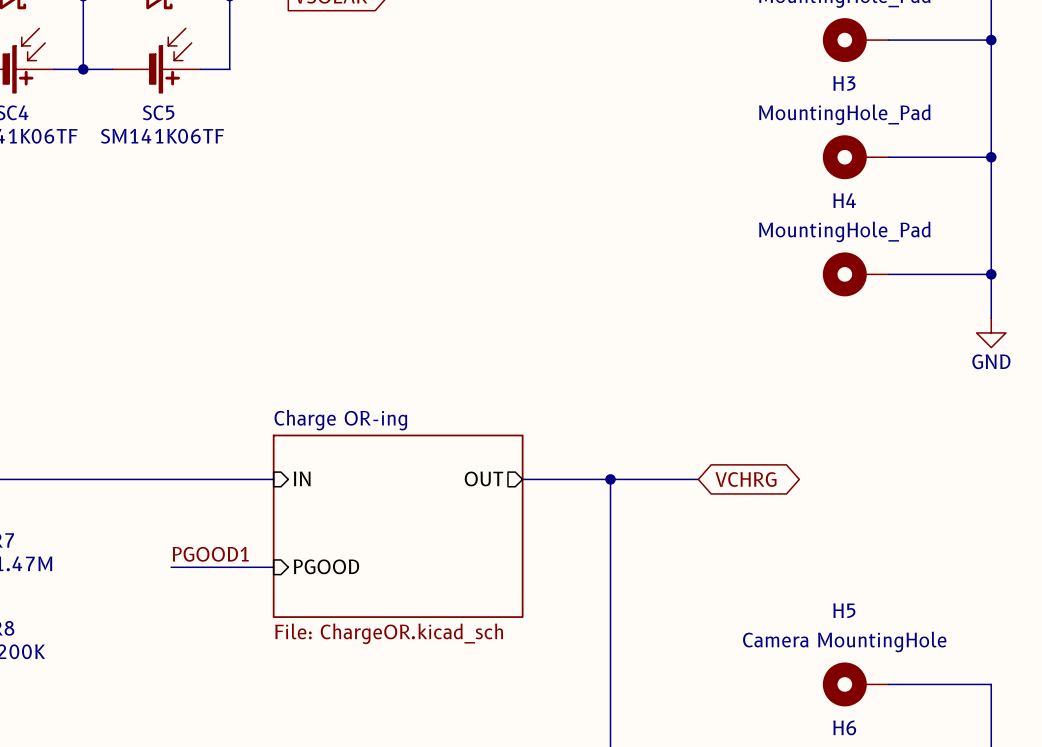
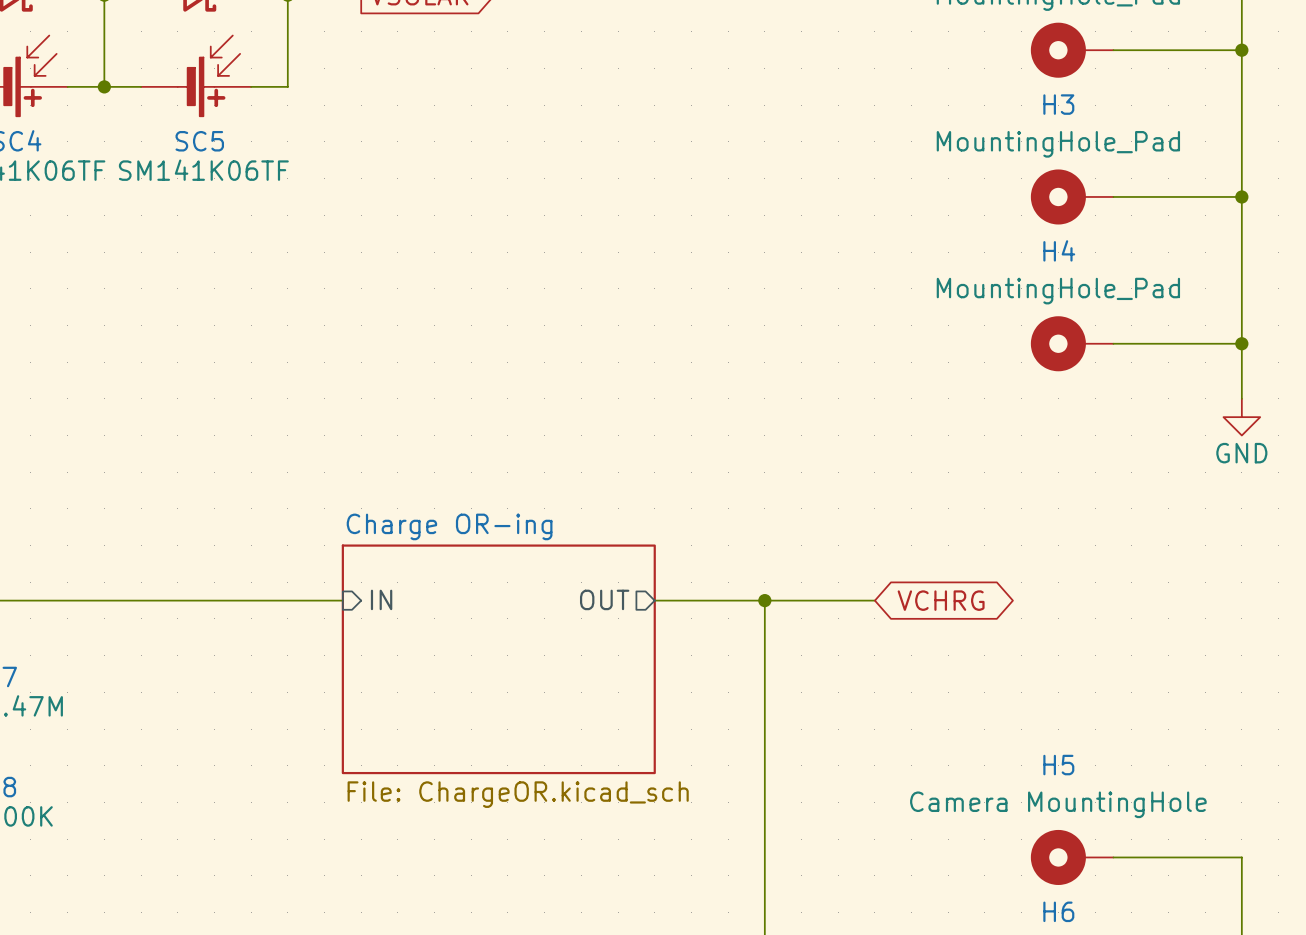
label: PGOOD1 (210, 554) -> none
sheet pin: PGOOD (326, 566) -> none
wire: (171, 567) (273, 567) -> none

